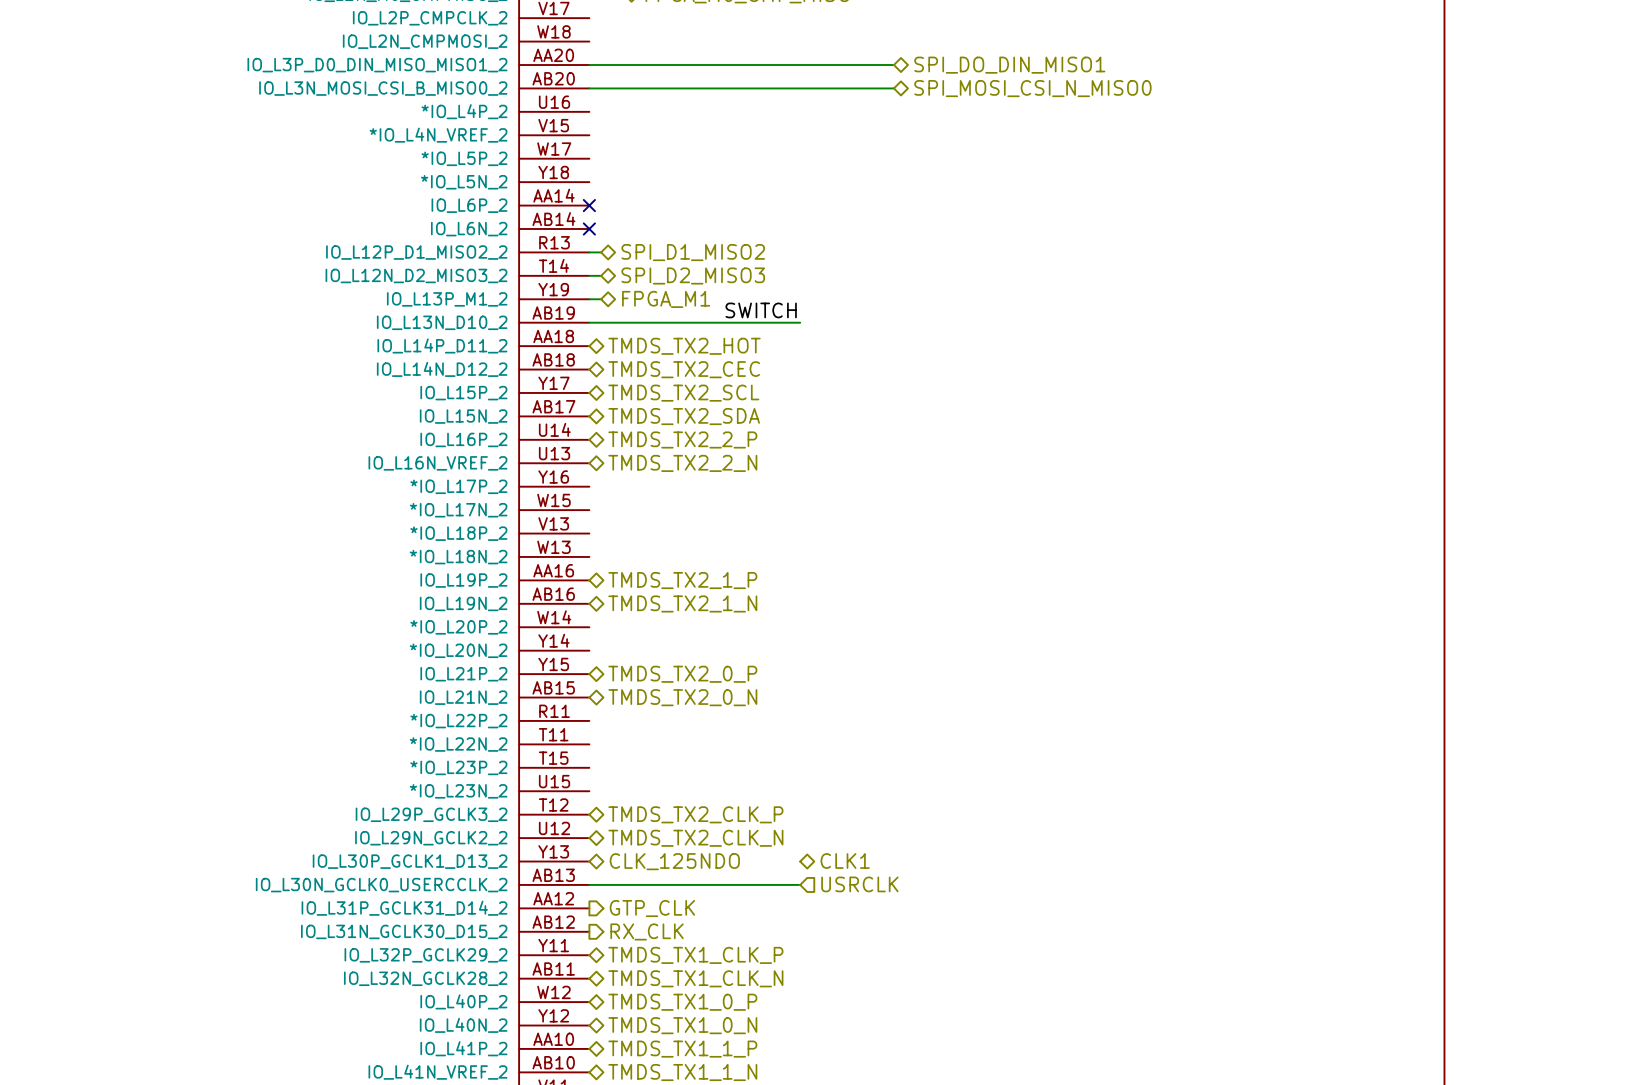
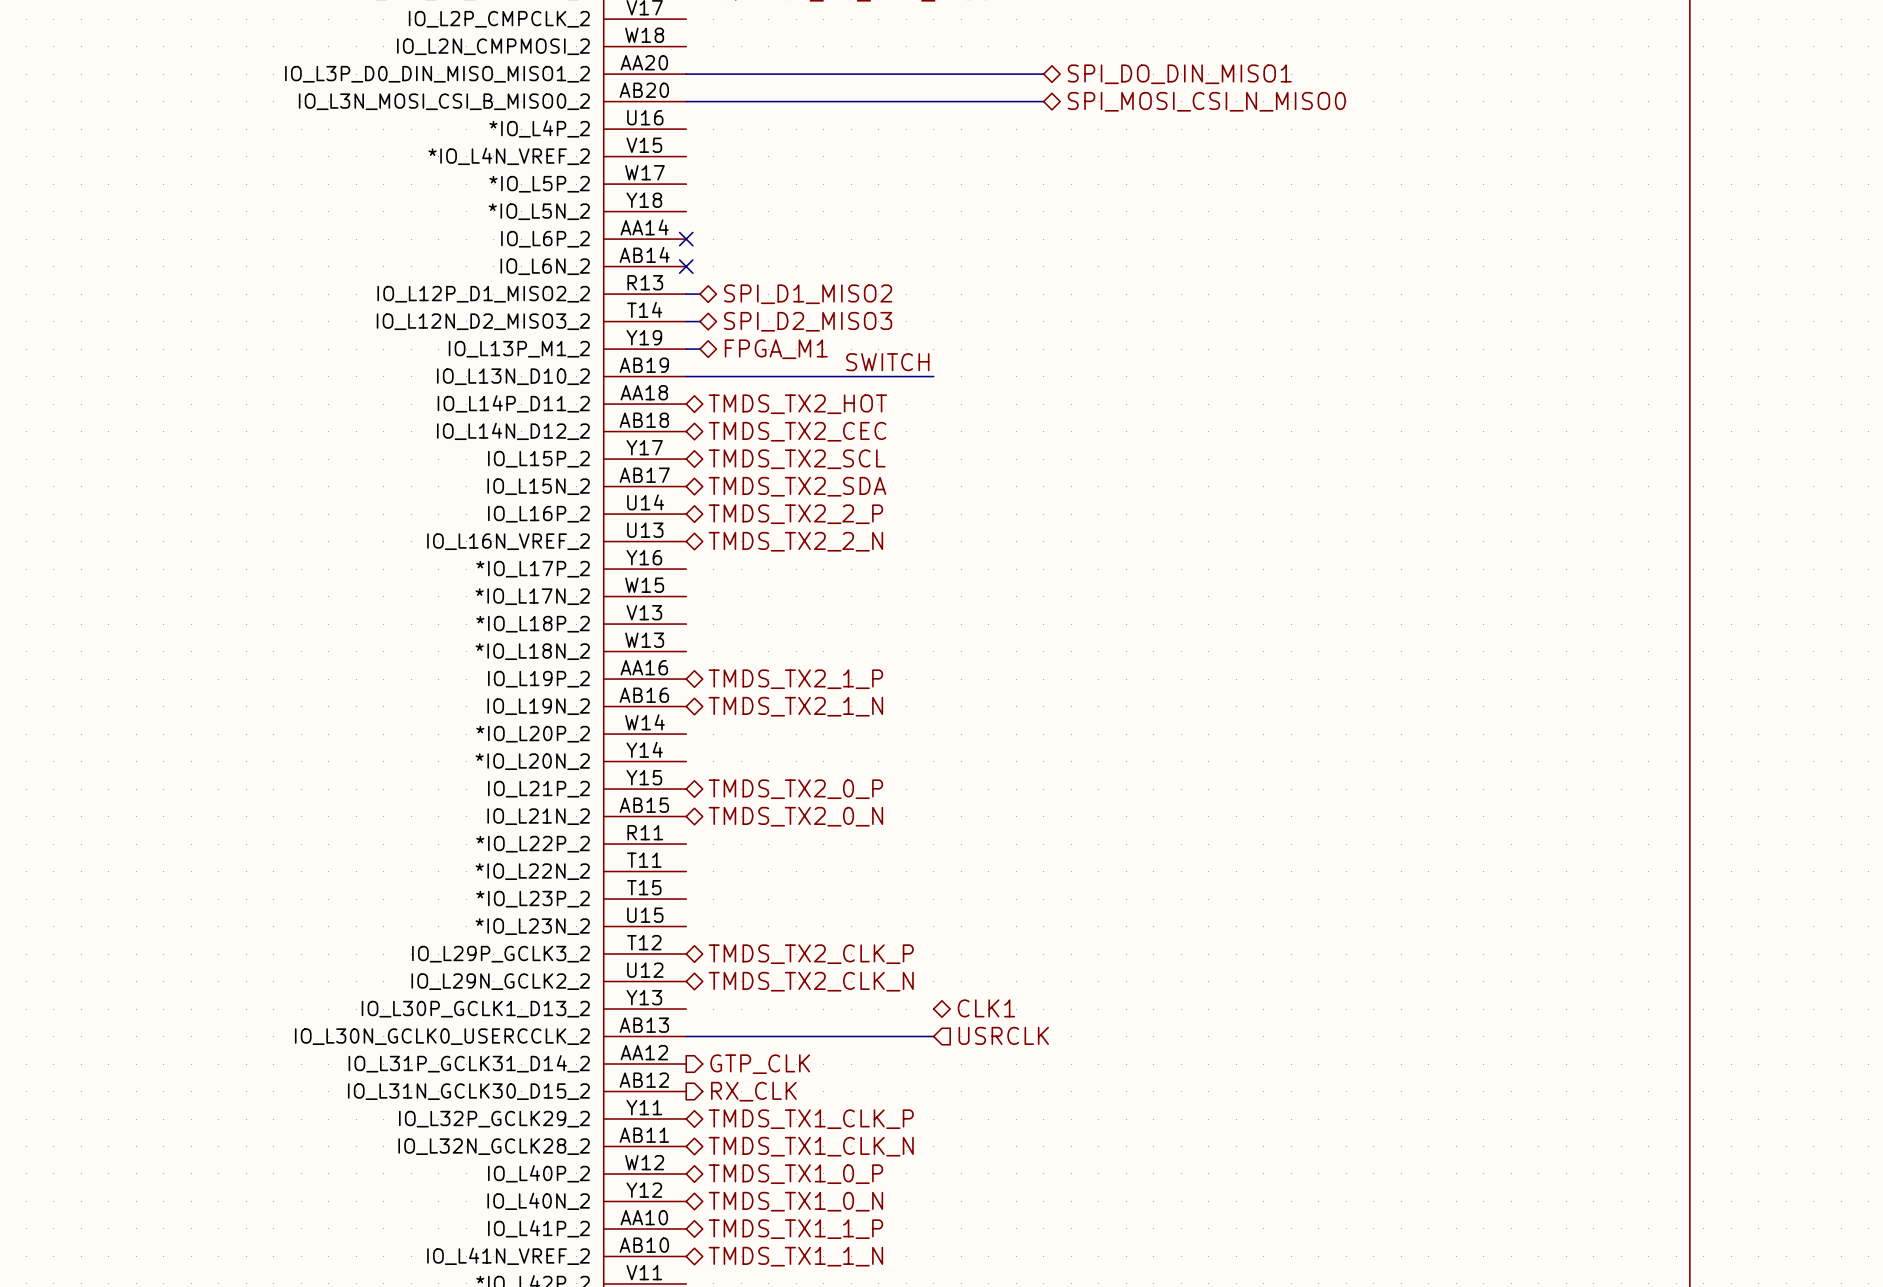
hierarchical label: CLK_125NDO (674, 861) -> none

